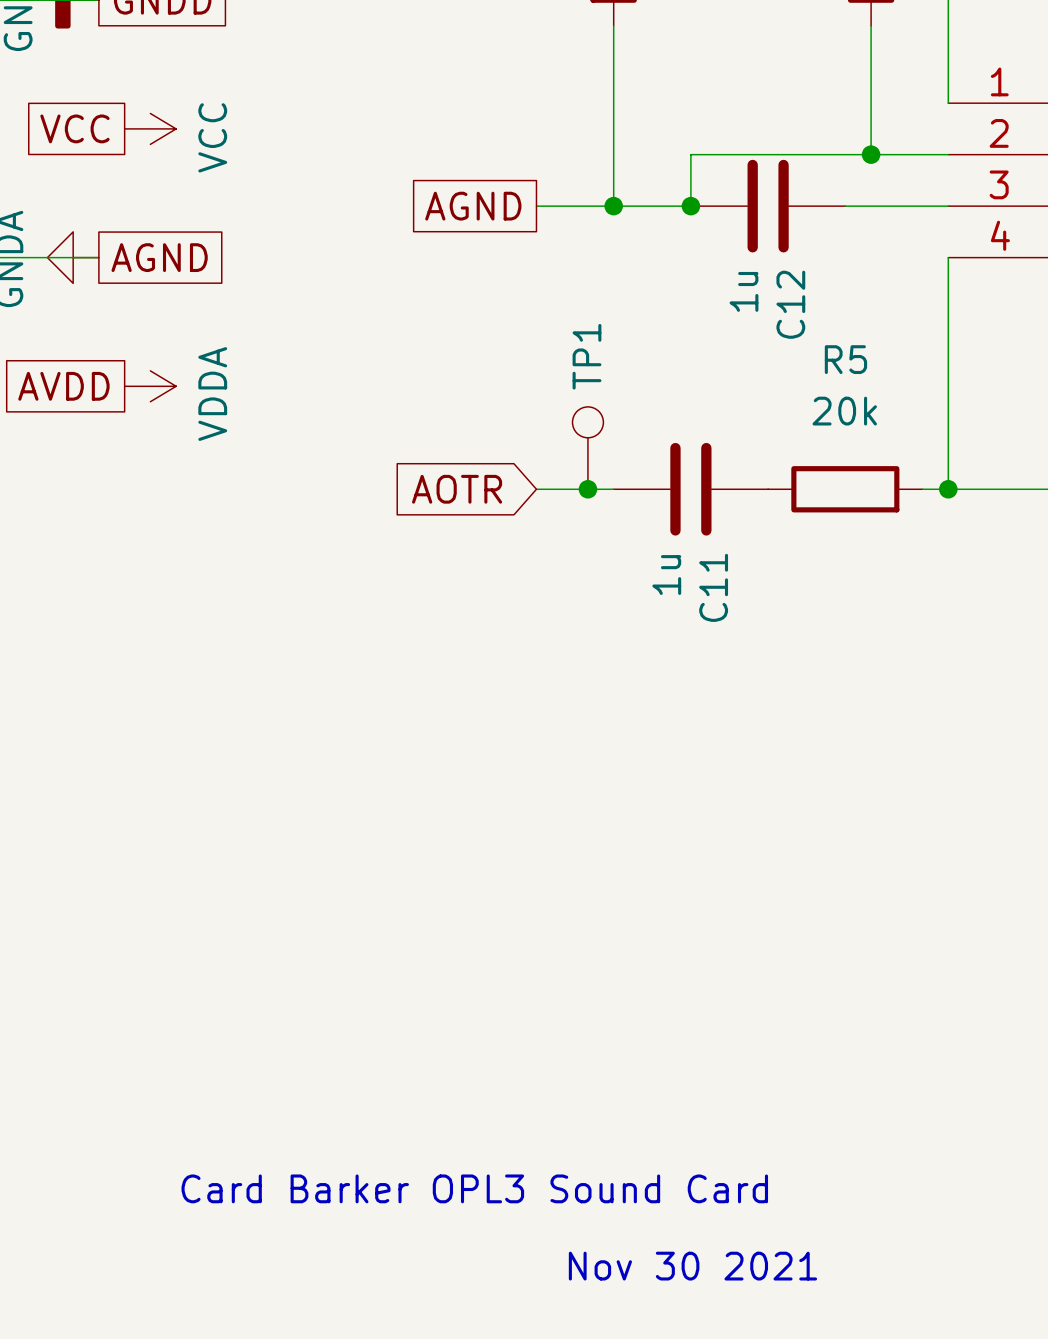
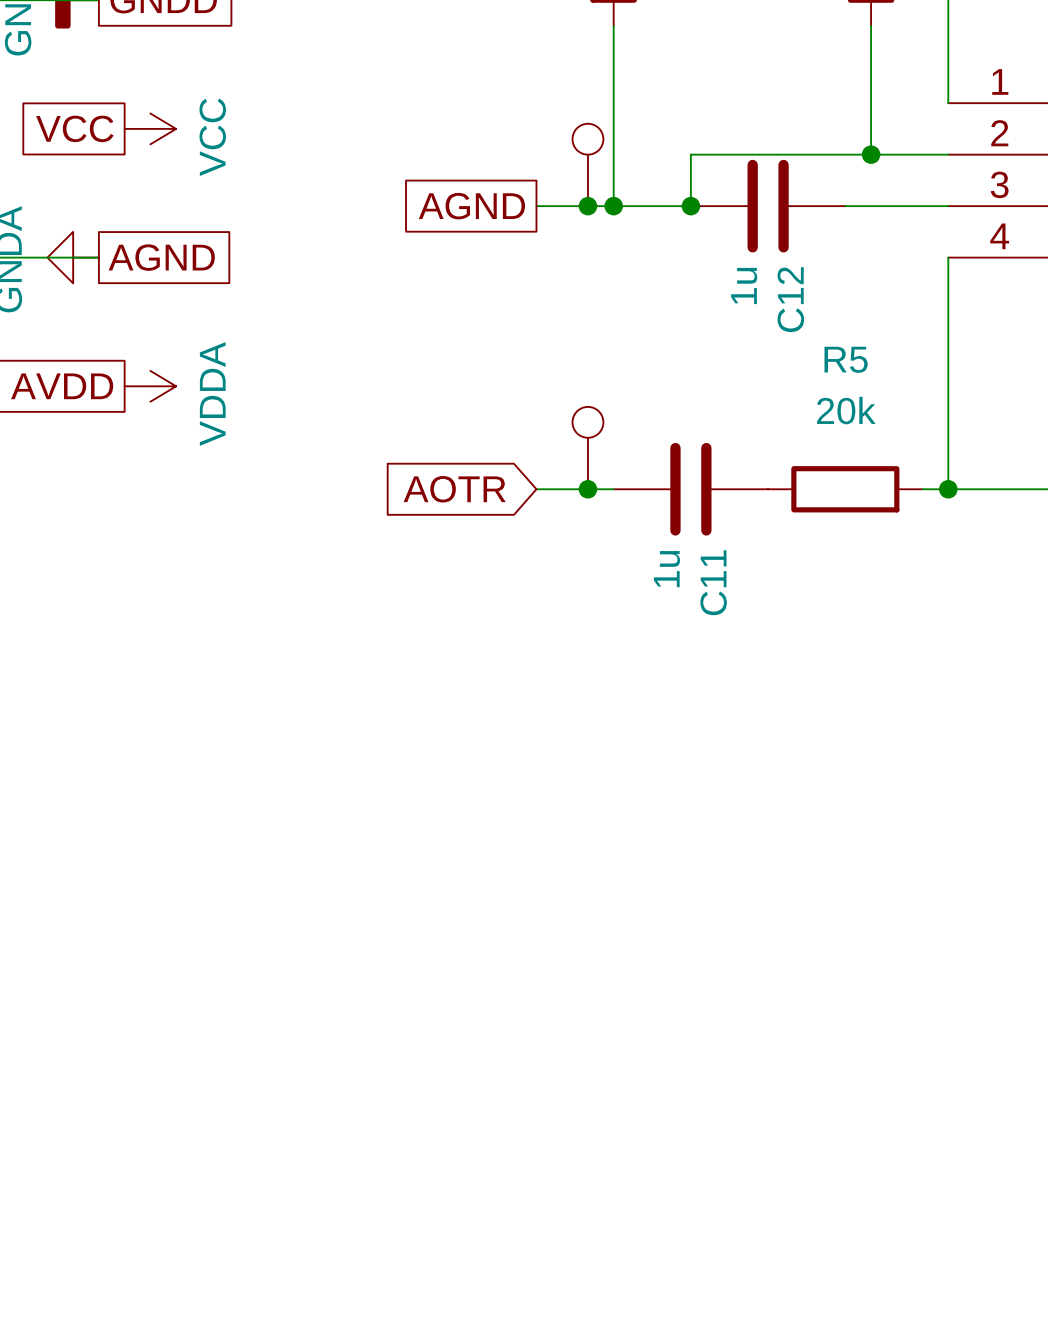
part: none -> (587, 164)
junction: none -> (587, 206)
TP1 name: TP1 (586, 356) -> none
text: Card Barker OPL3 Sound Card (474, 1188) -> none
text: Nov 30 2021 (692, 1266) -> none

